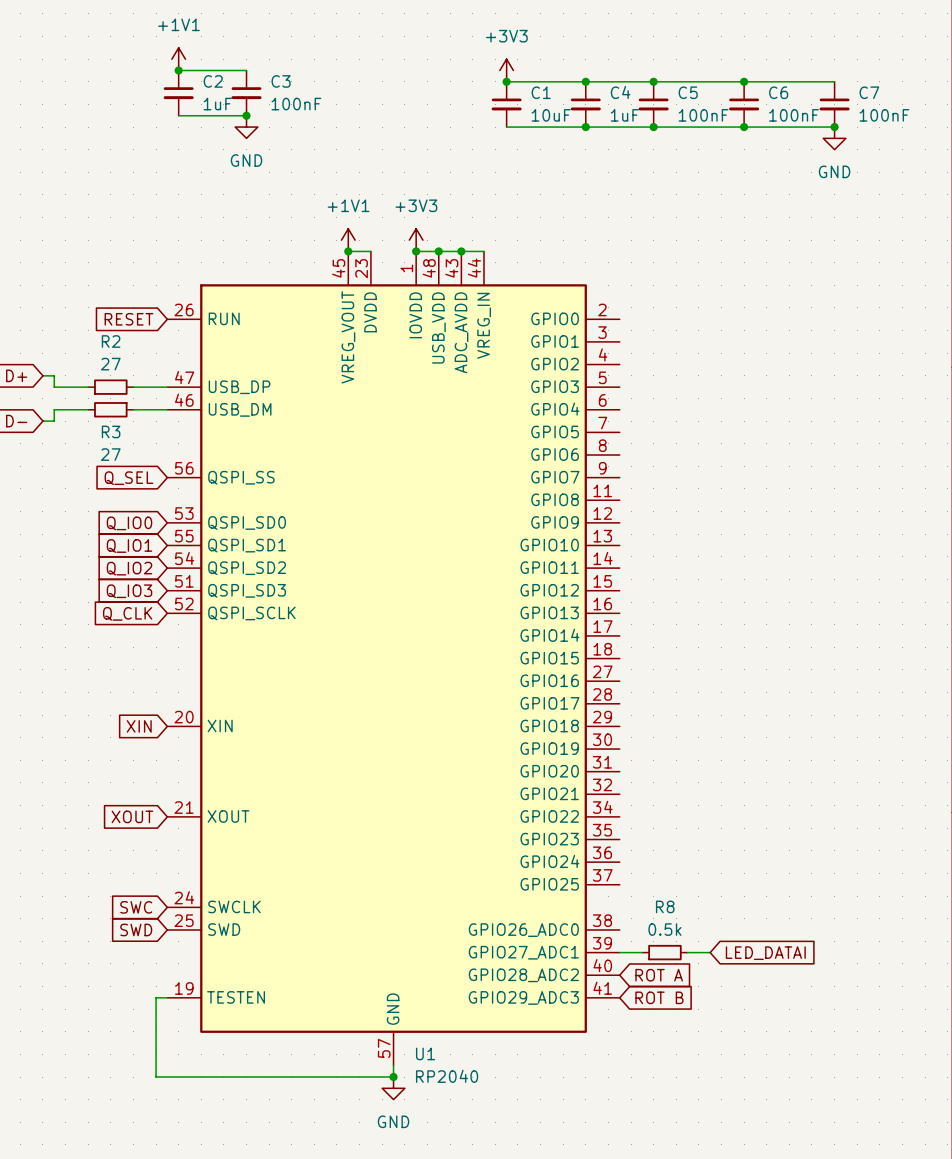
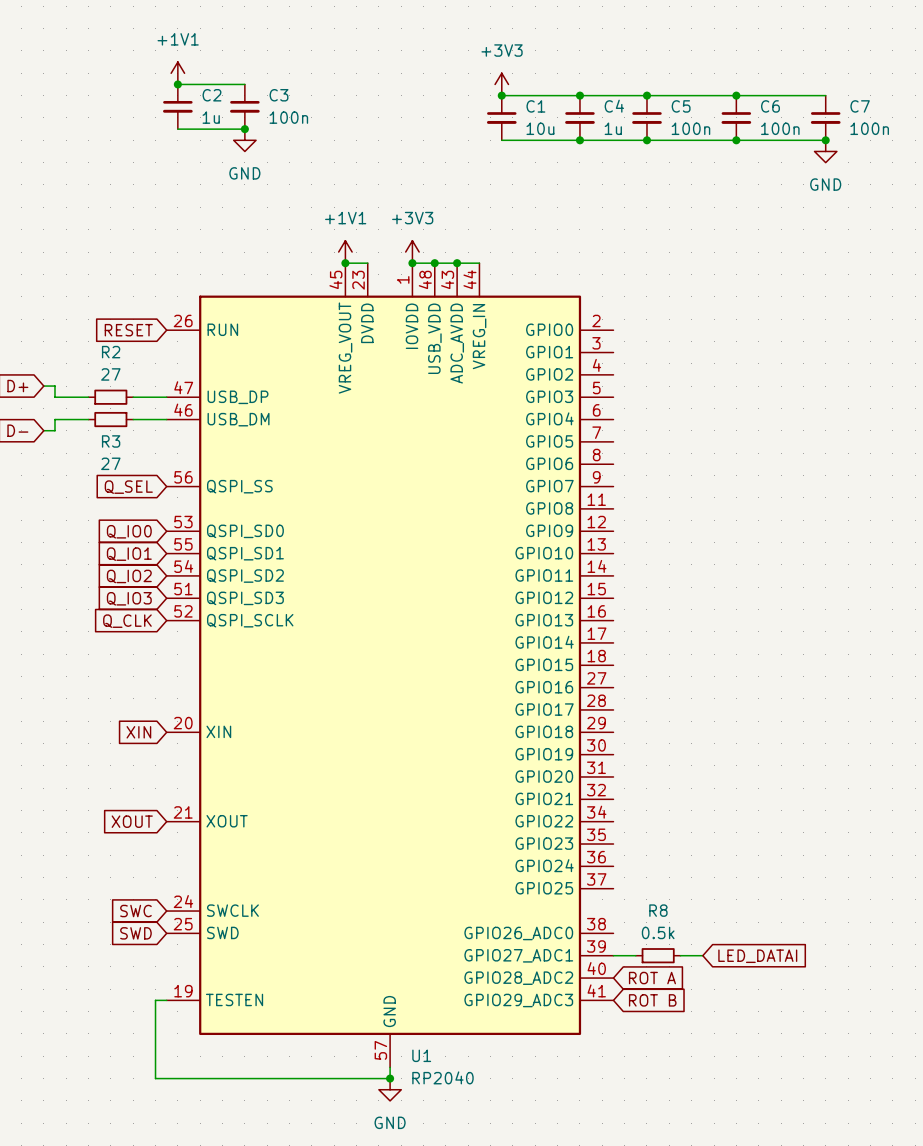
C2 value: 1uF (217, 104) -> 1u (211, 117)
C3 value: 100nF (296, 104) -> 100n (288, 117)
C1 value: 10uF (551, 115) -> 10u (540, 128)
C4 value: 1uF (624, 115) -> 1u (613, 128)
C5 value: 100nF (703, 115) -> 100n (690, 128)
C6 value: 100nF (794, 115) -> 100n (780, 128)
C7 value: 100nF (884, 115) -> 100n (869, 128)

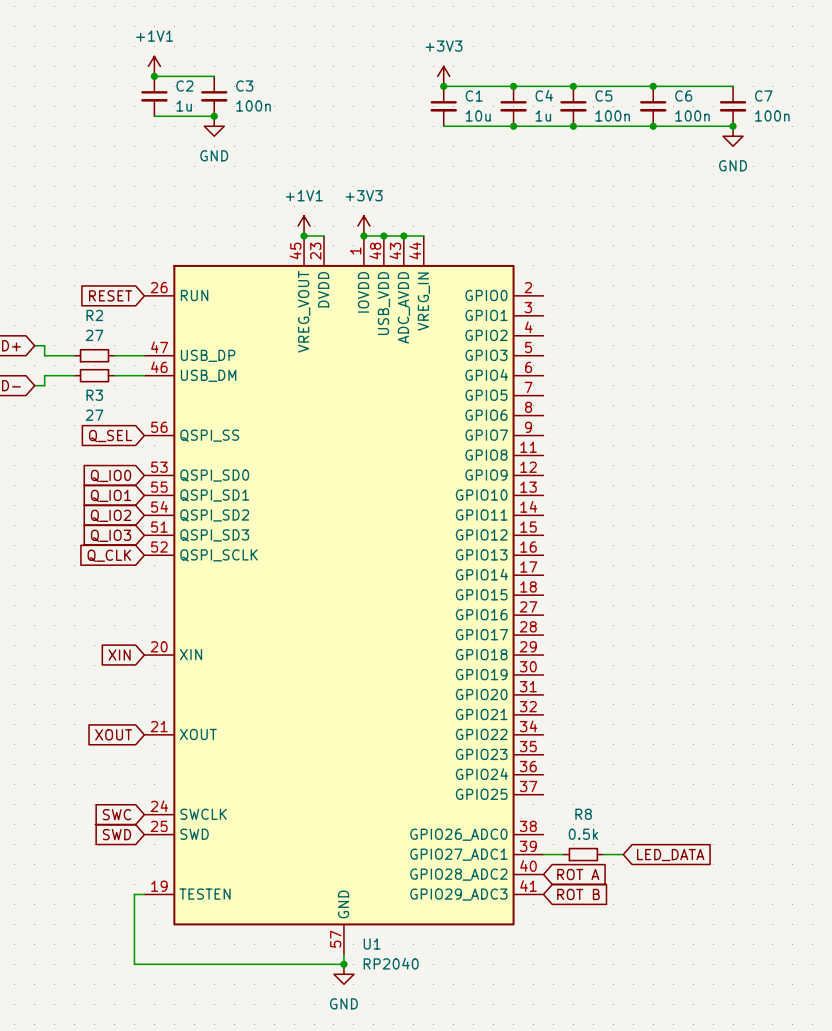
global label: LED_DATAI (757, 956) -> LED_DATA (670, 855)

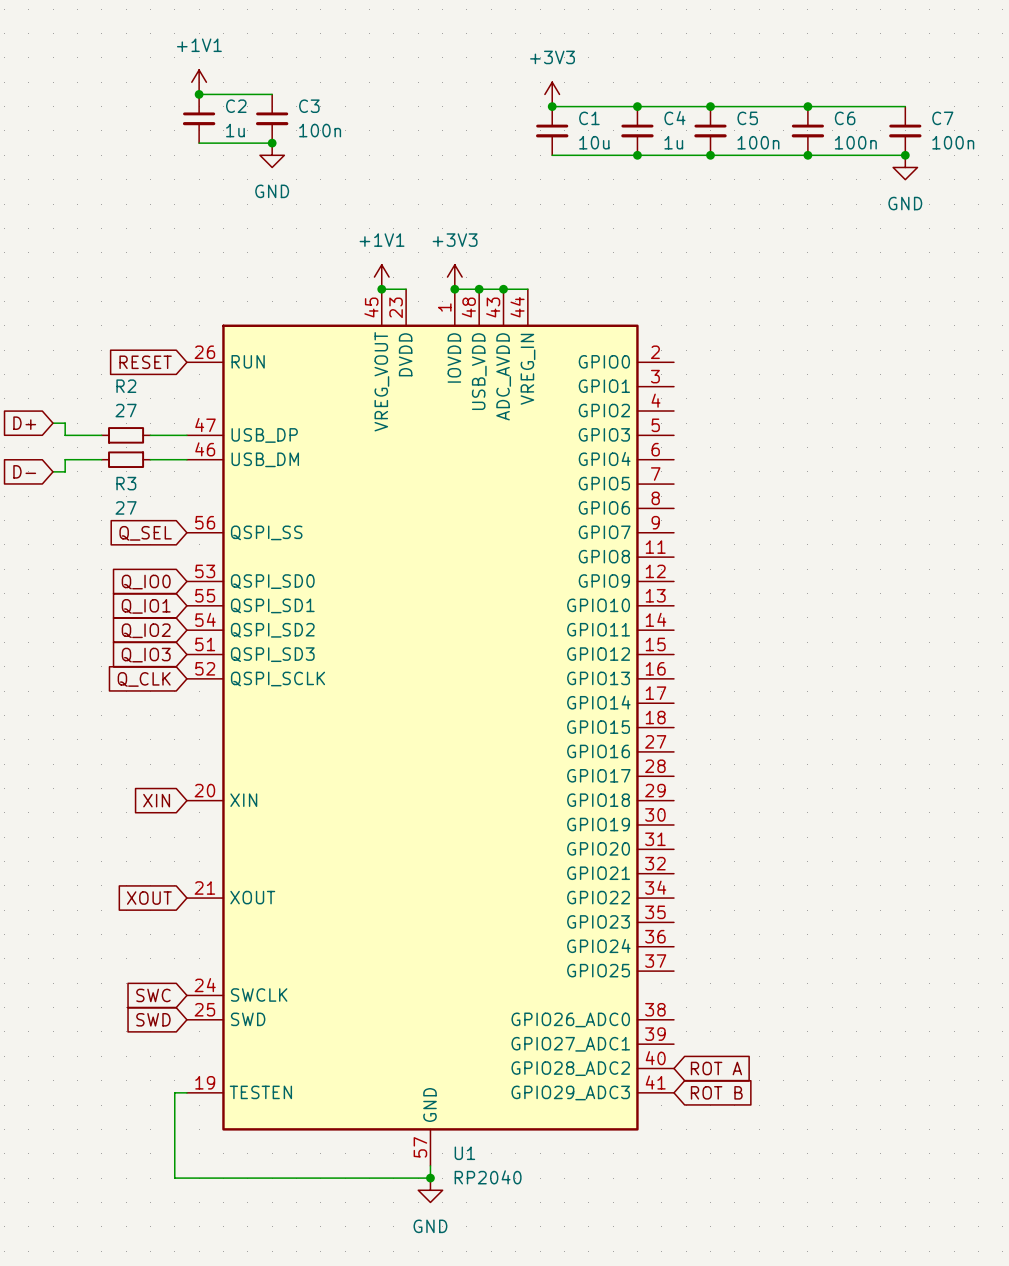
wire: (543, 854) (563, 854) -> none
R8: 0.5k (583, 854) -> none
wire: (603, 854) (623, 854) -> none
global label: LED_DATA (670, 855) -> none

